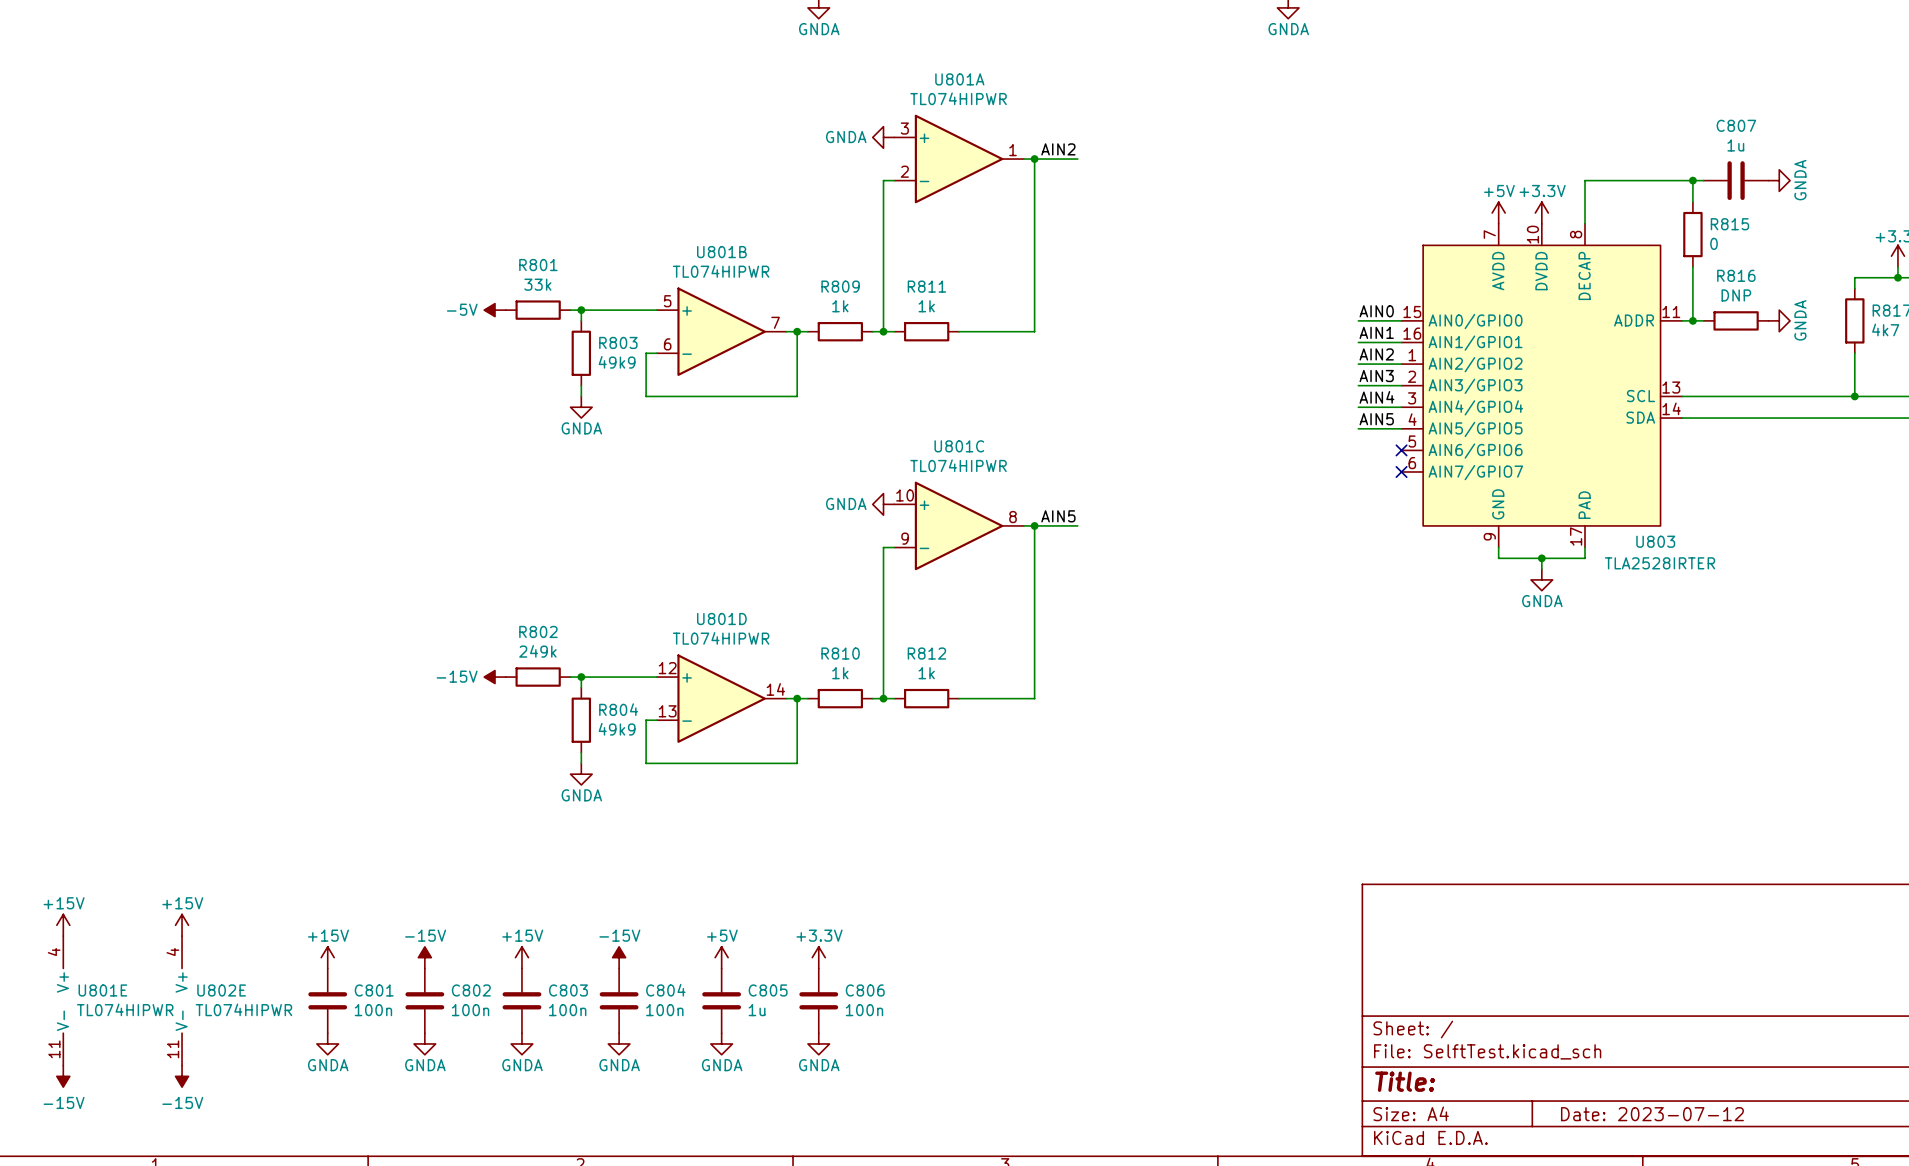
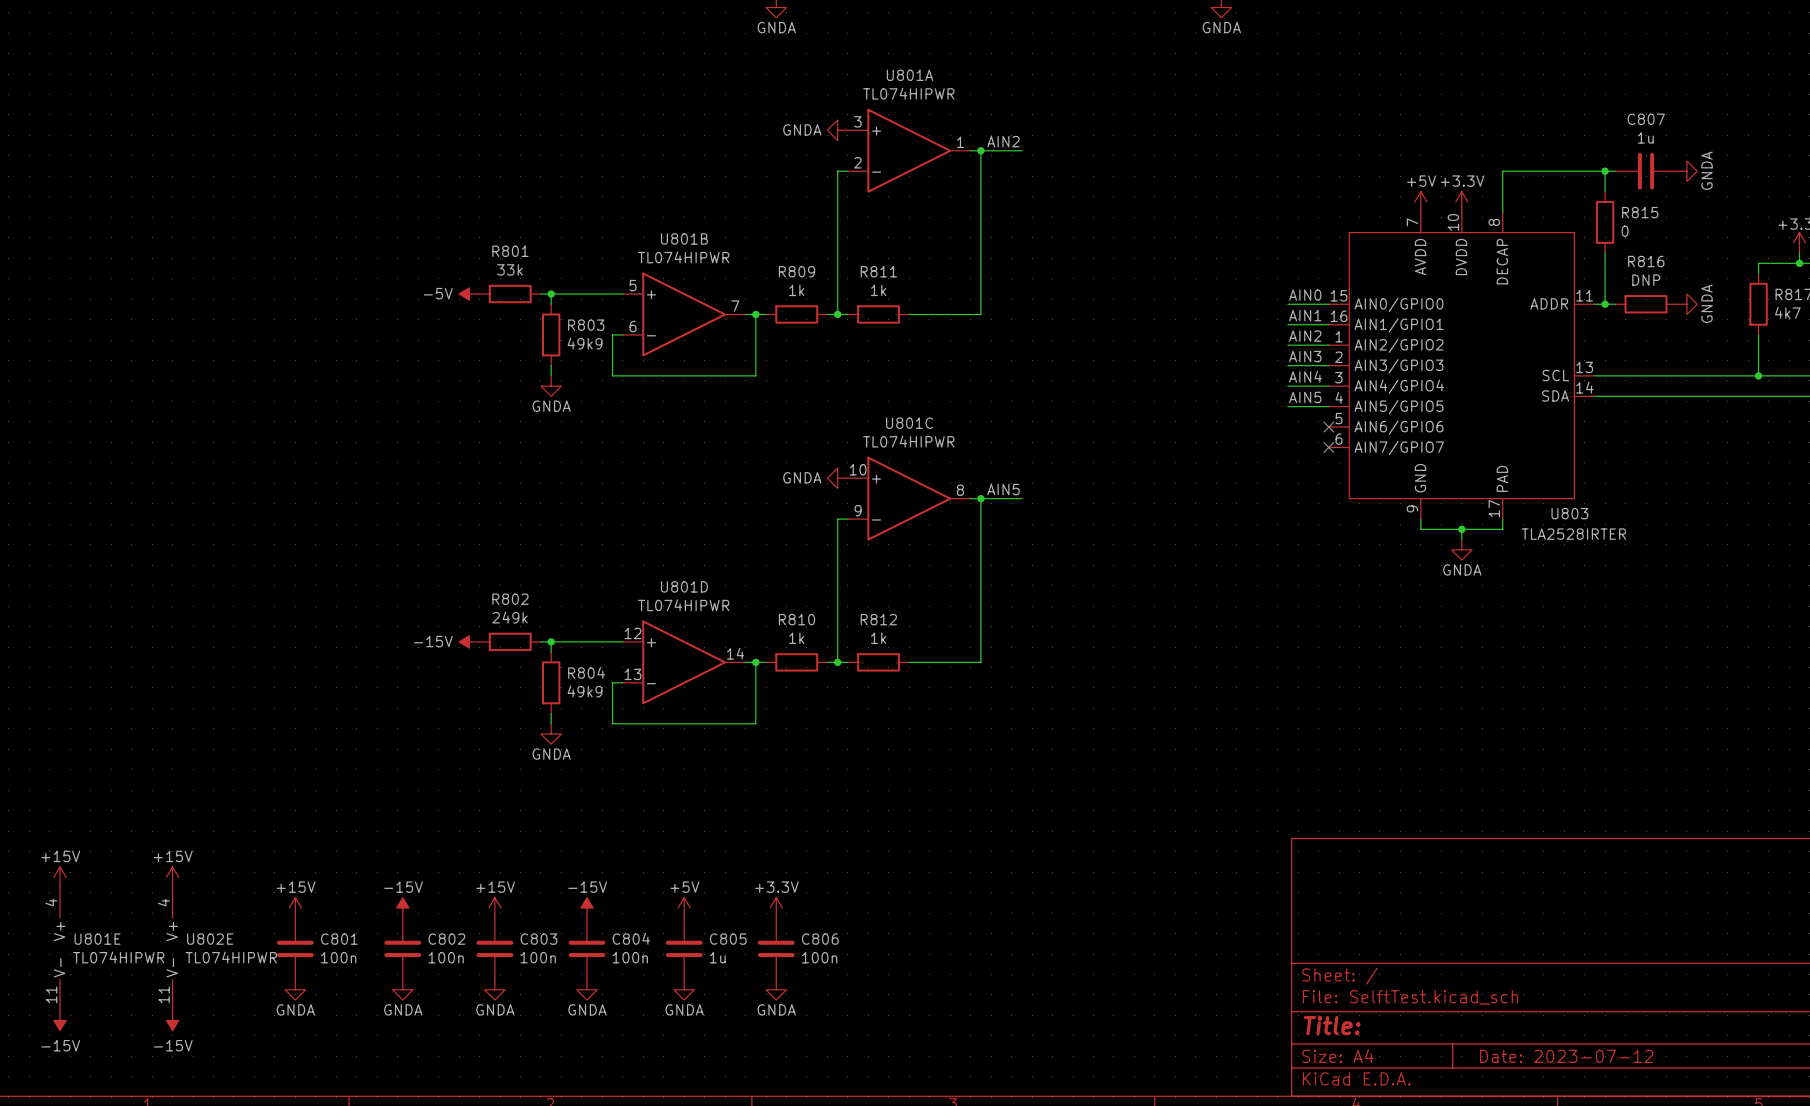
power symbol position: +15V (327, 957) -> +15V (295, 907)
C801 position: (327, 1000) -> (295, 948)
power symbol position: GNDA (327, 1043) -> GNDA (295, 989)

